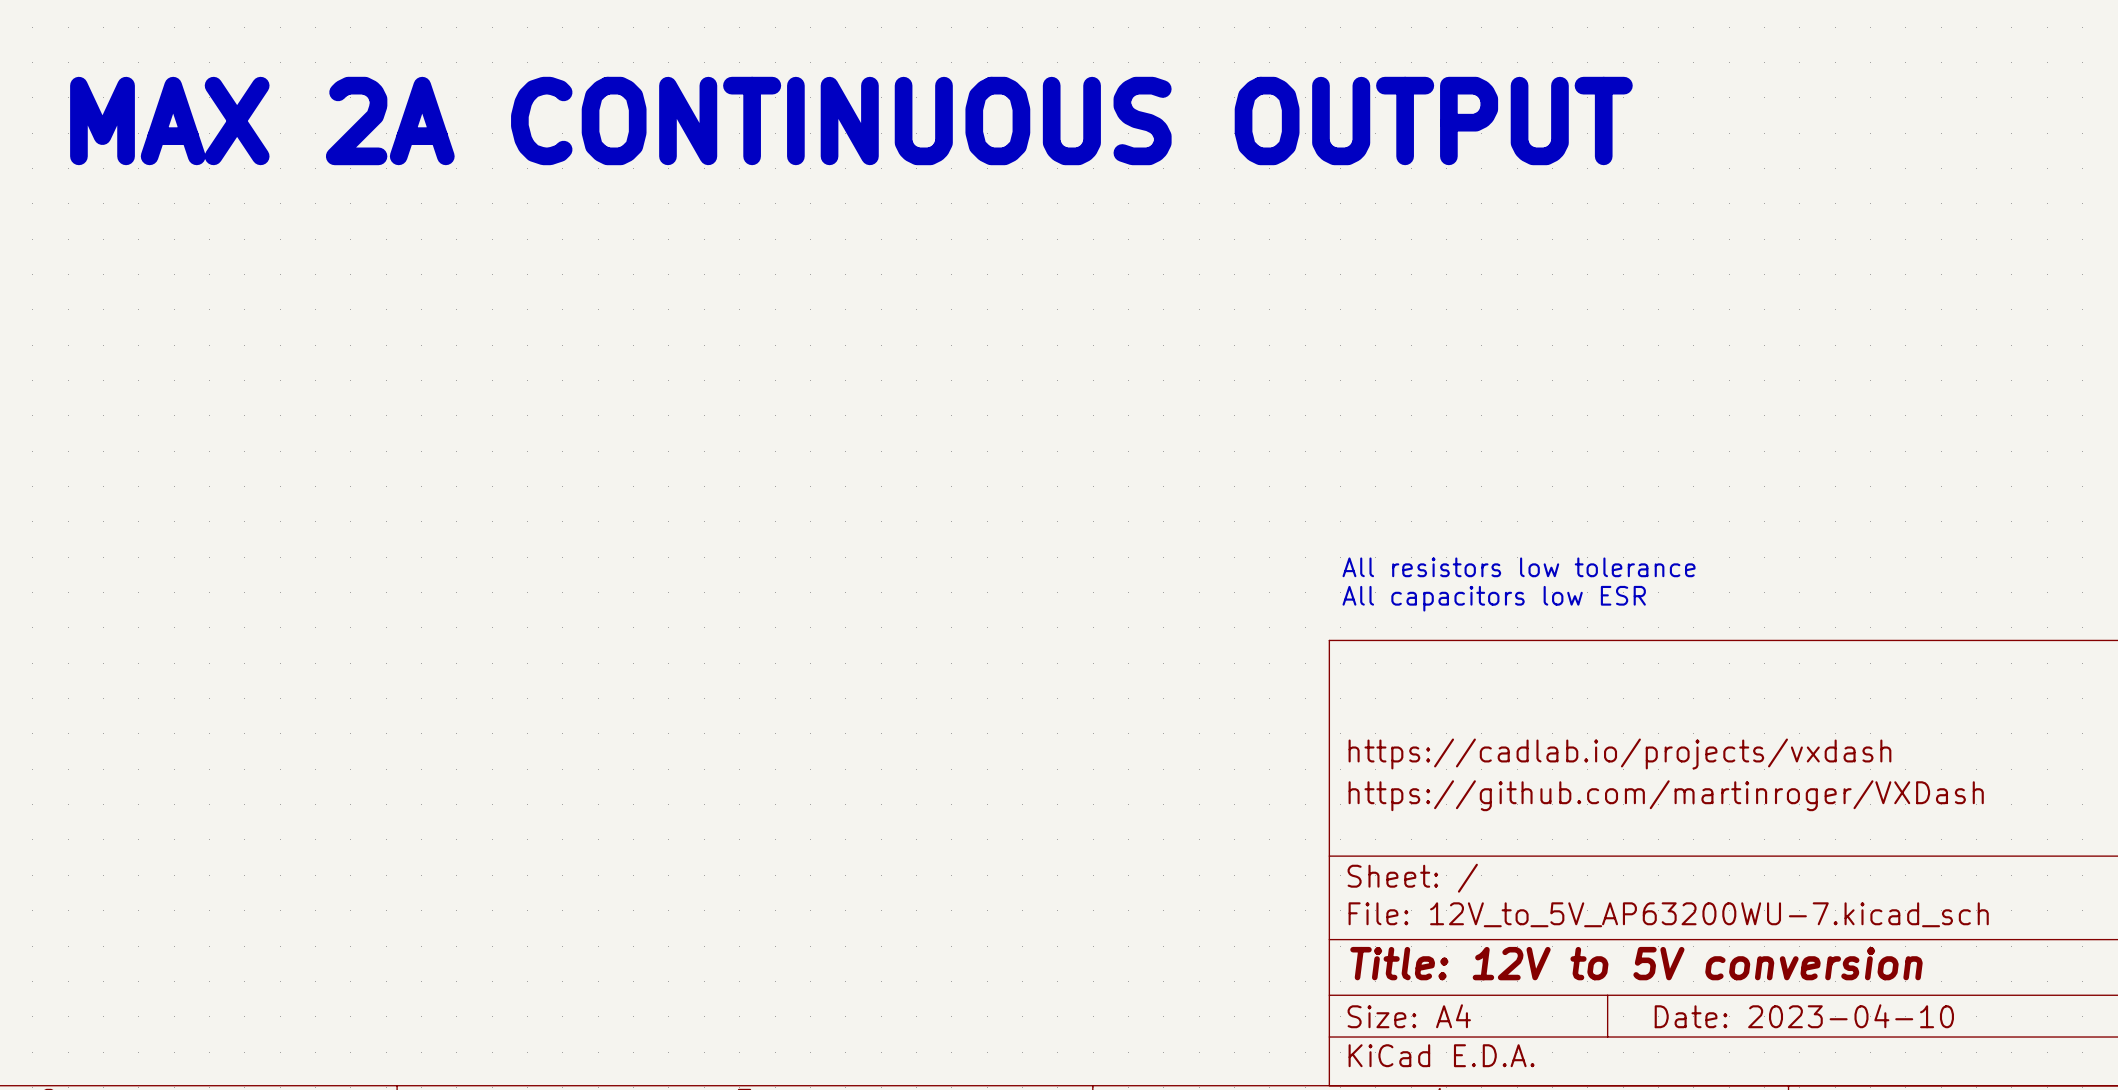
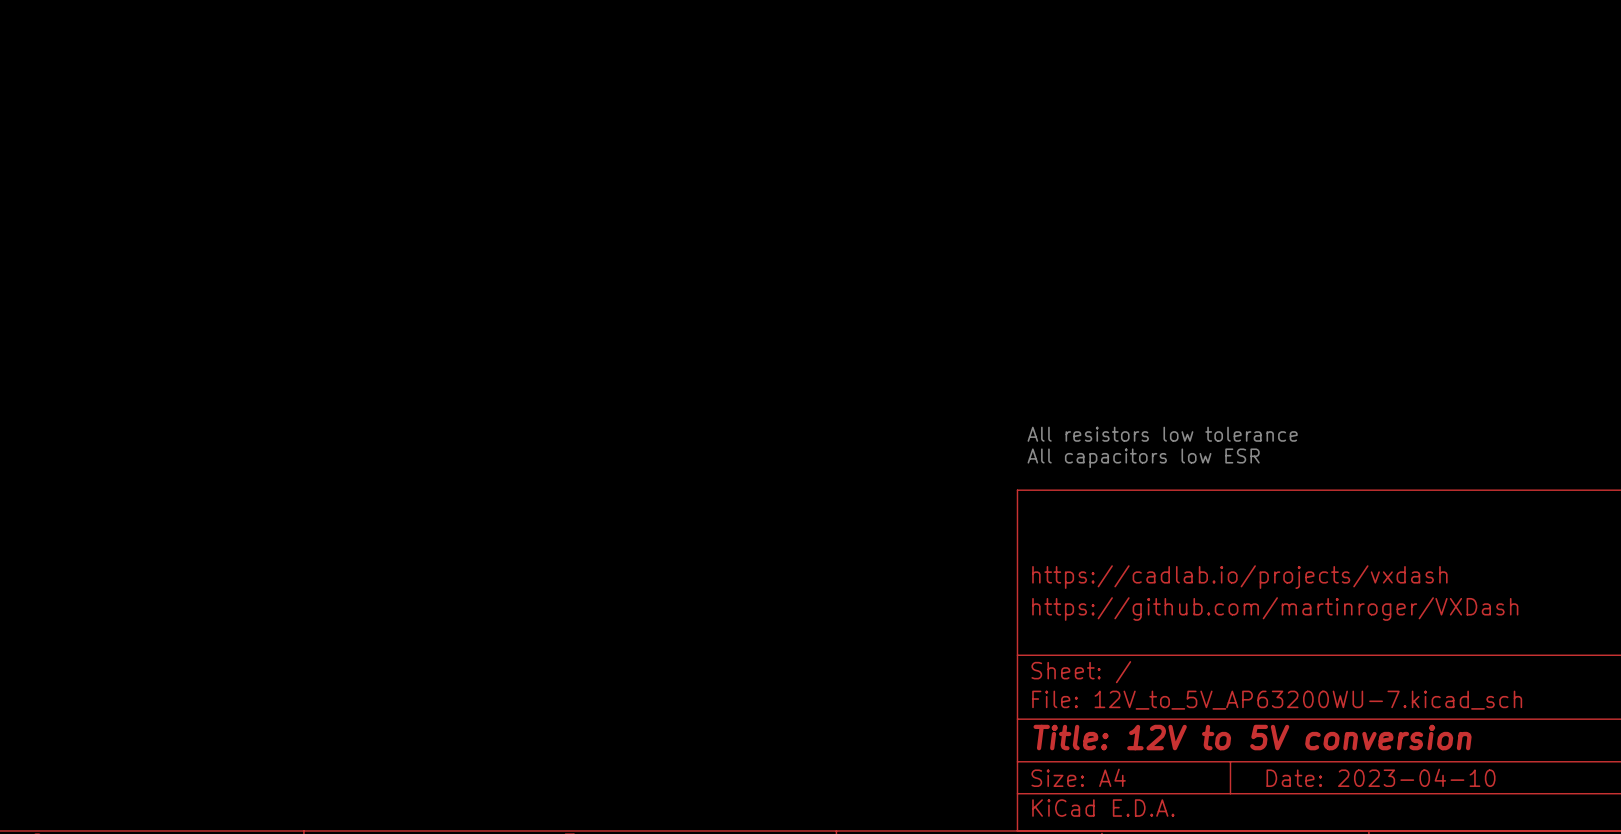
text: MAX 2A CONTINUOUS OUTPUT (851, 121) -> none

